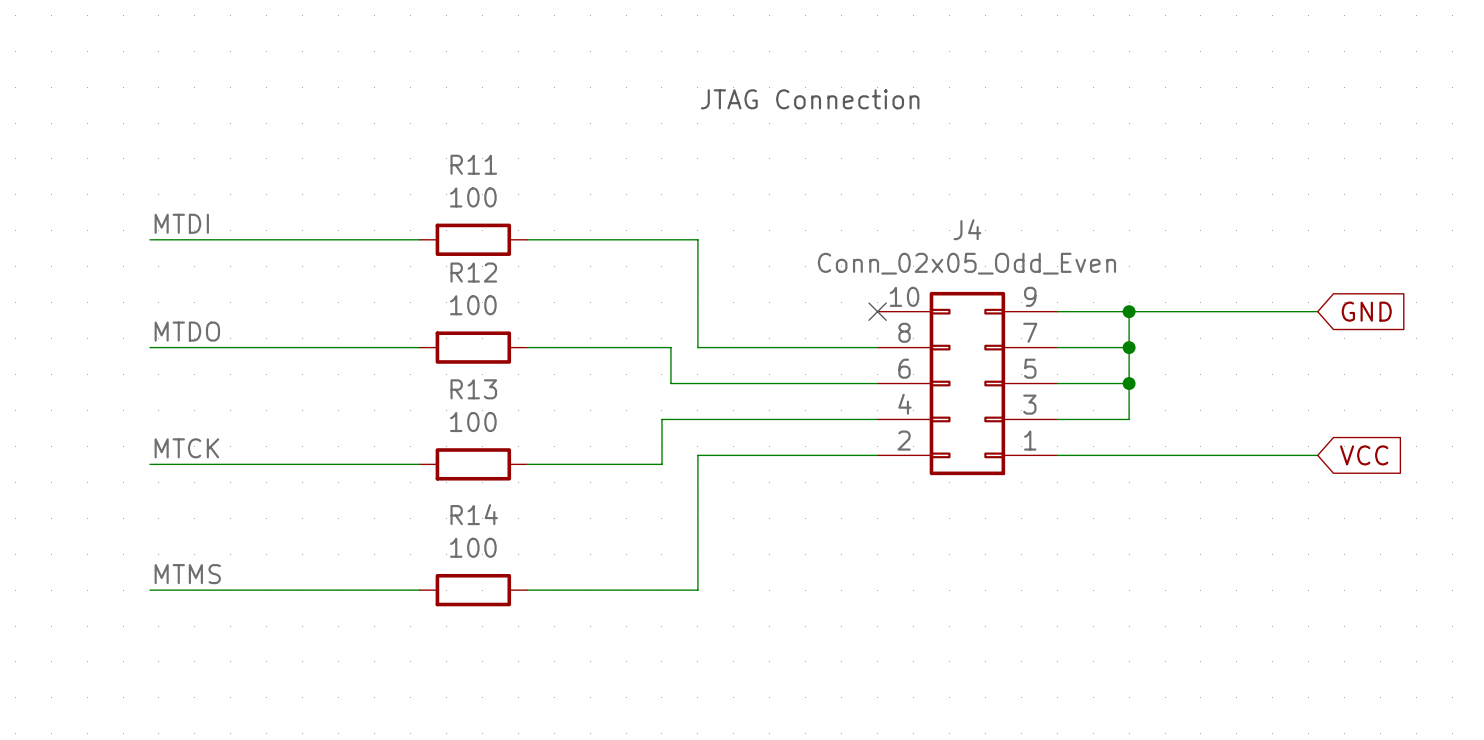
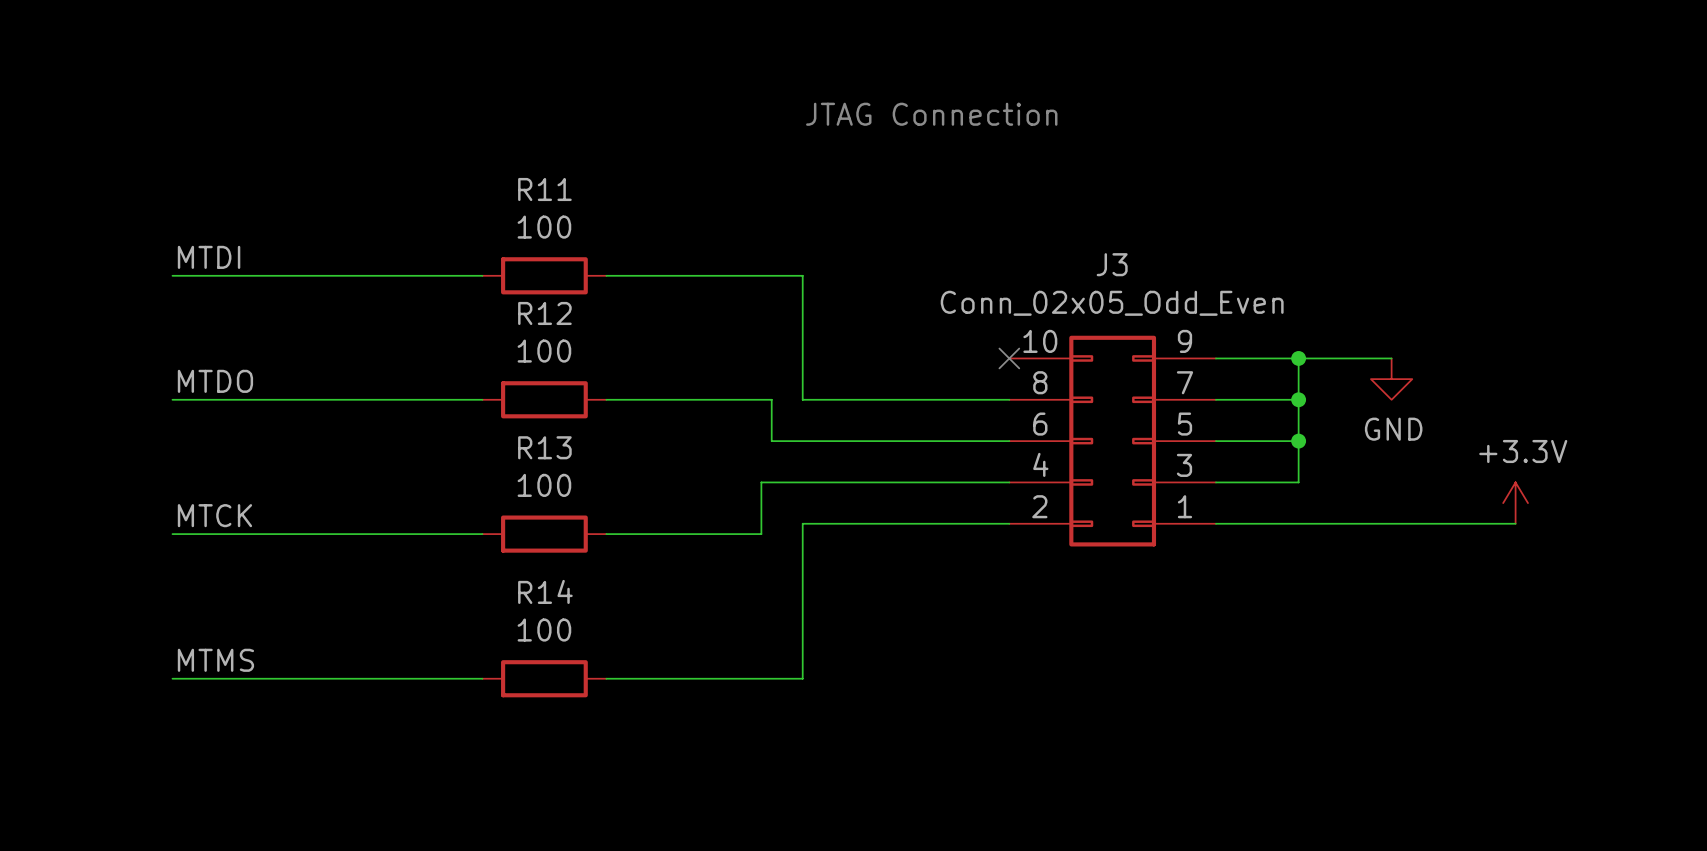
J4 name: J4 (967, 229) -> J3 (1112, 264)
wire: (1209, 311) (1317, 311) -> none
global label: GND (1366, 311) -> none
power symbol: none -> GND (1391, 379)
power symbol: none -> +3.3V (1515, 503)
global label: VCC (1364, 455) -> none

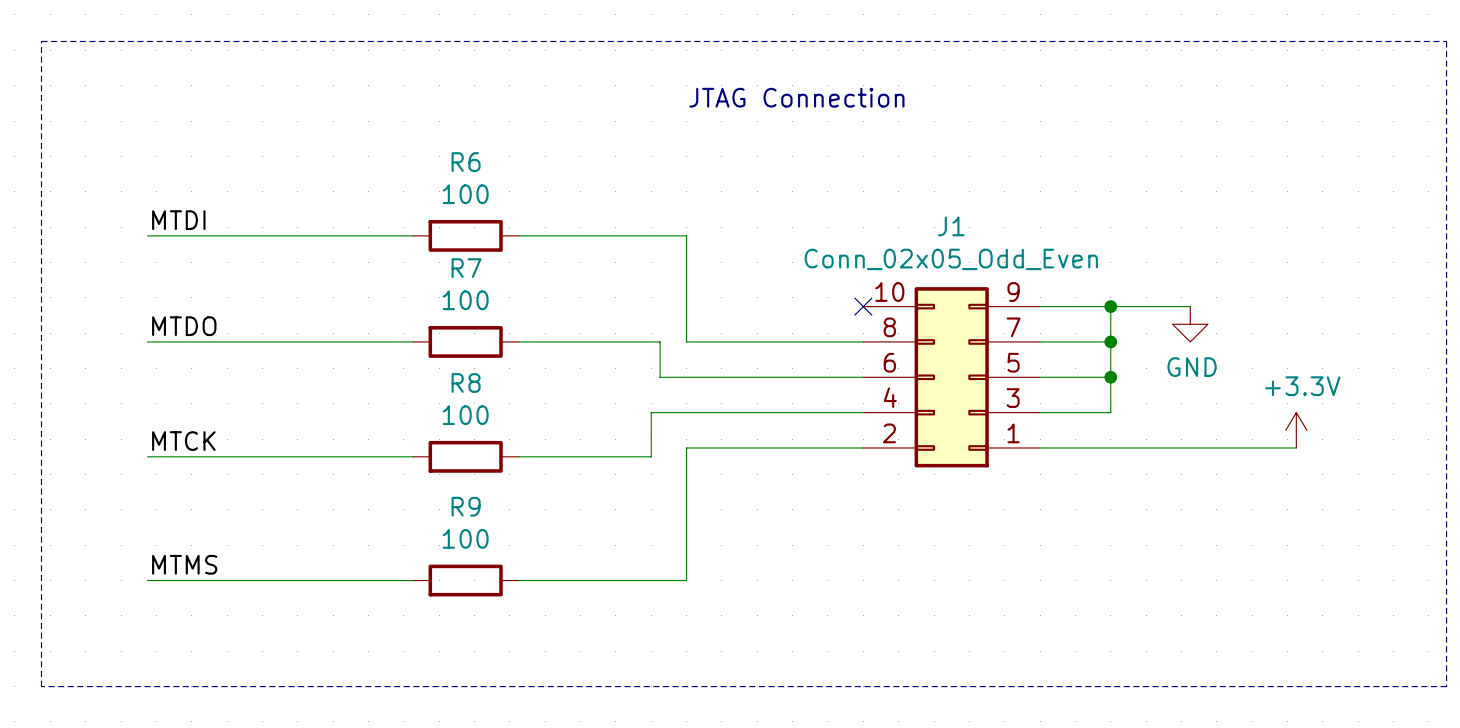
line: none -> (41, 41) (41, 686) (1446, 686) (1446, 41) (41, 41)
R11 name: R11 (544, 189) -> R6 (466, 162)
J3 name: J3 (1112, 264) -> J1 (951, 226)
R12 name: R12 (544, 313) -> R7 (466, 268)
R13 name: R13 (544, 447) -> R8 (466, 382)
R14 name: R14 (545, 591) -> R9 (466, 506)

